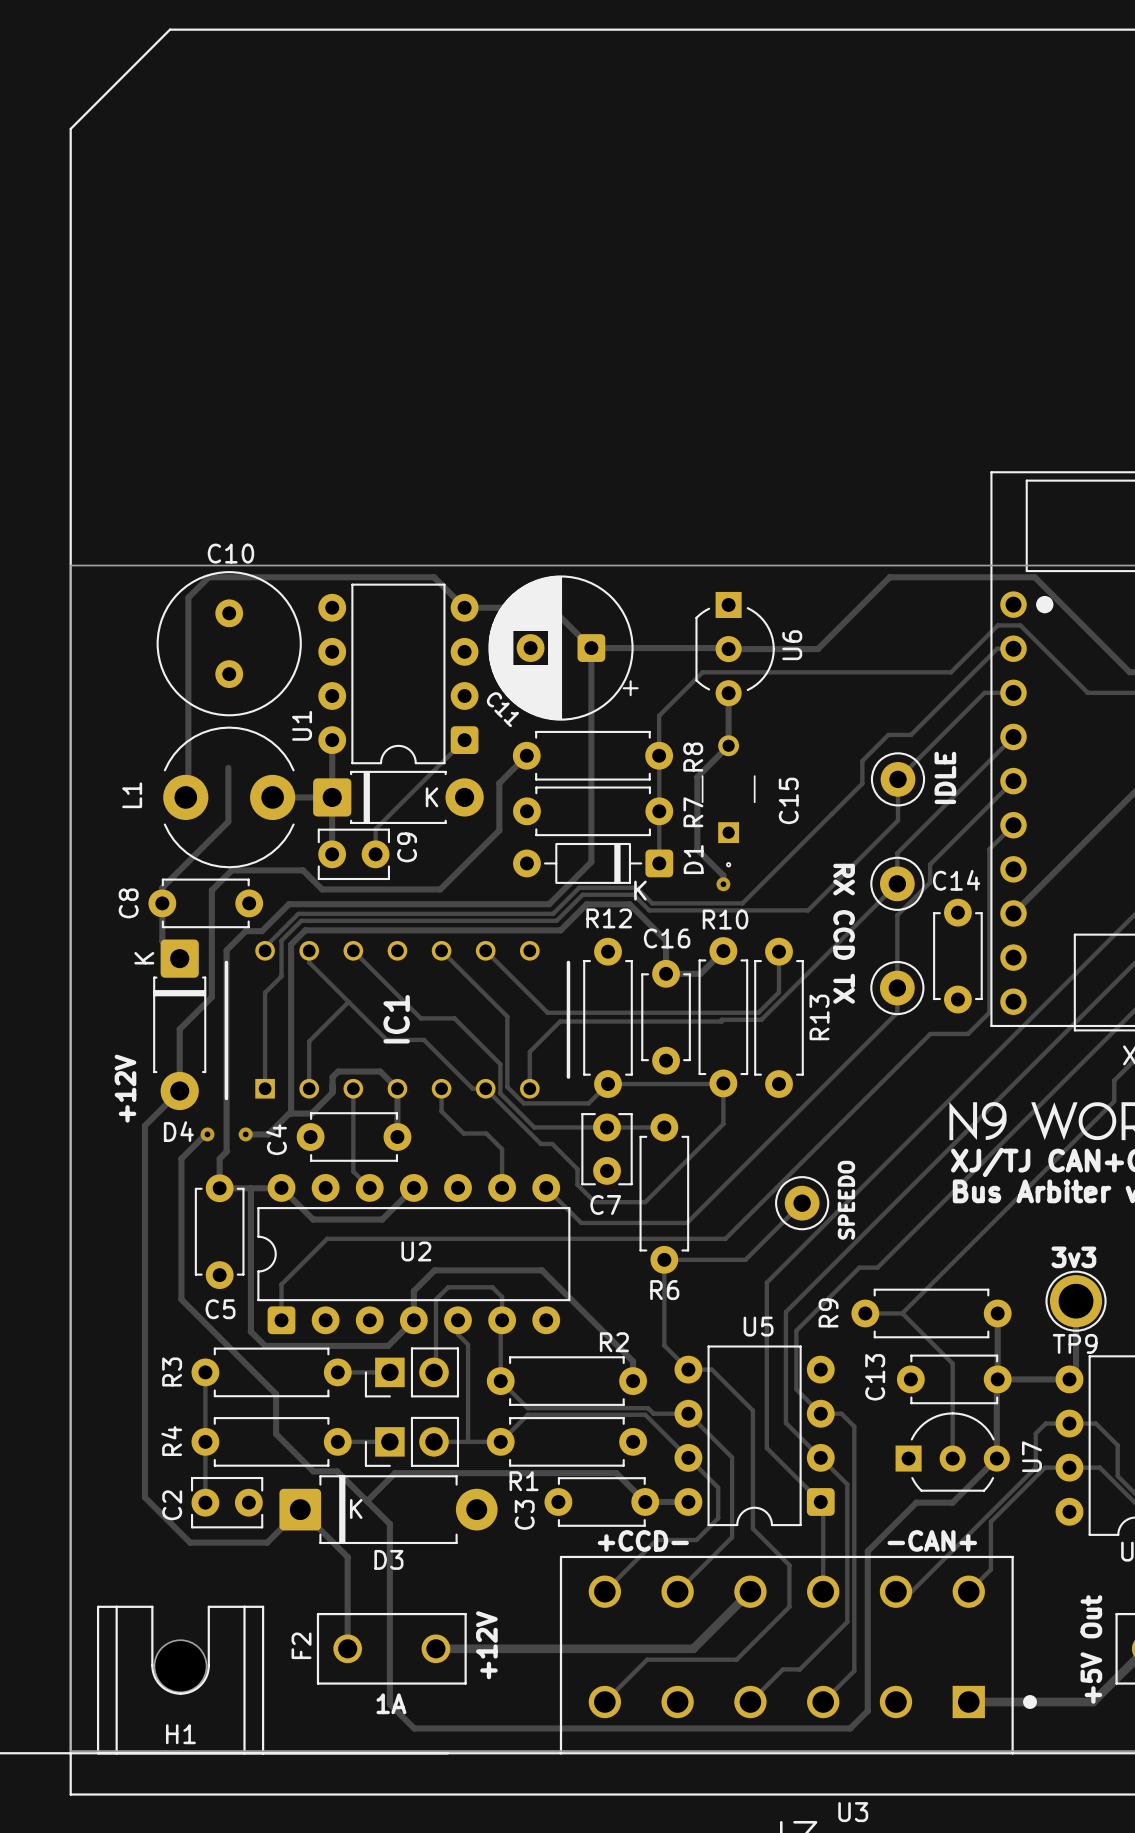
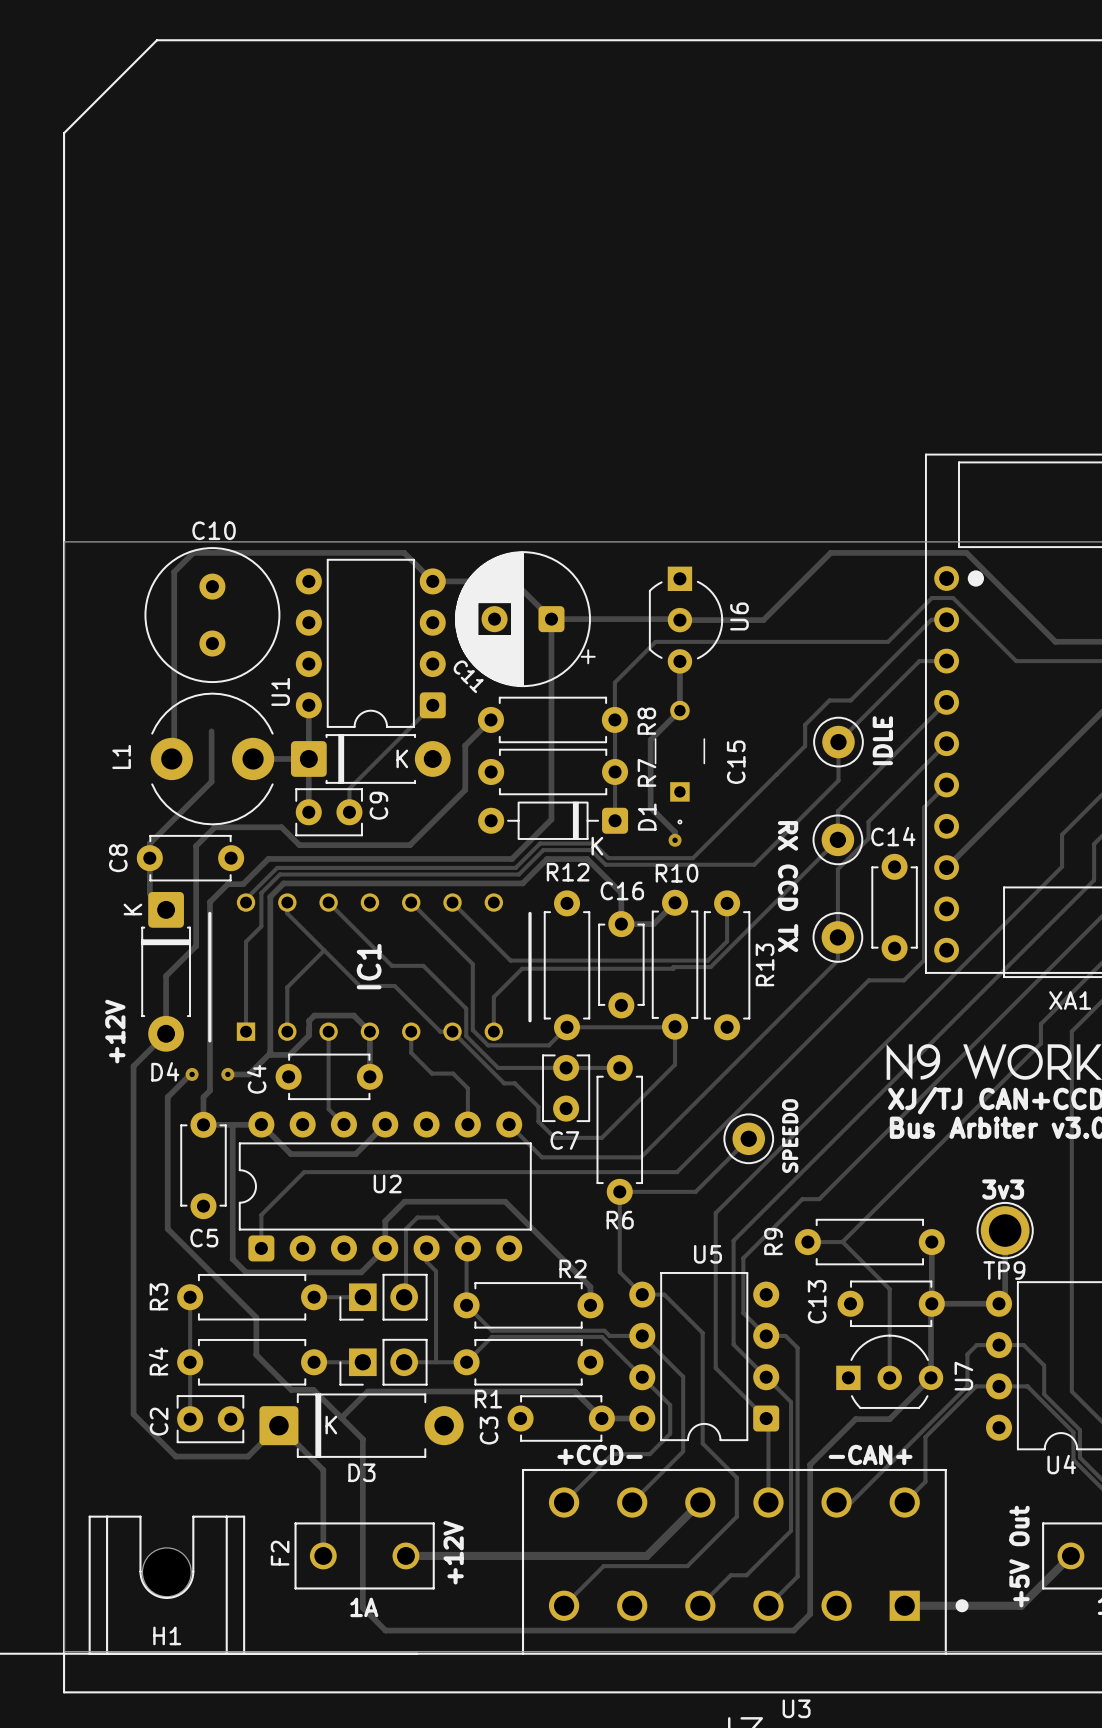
track: (469, 1287) (492, 1287) (502, 1297) (502, 1320) -> (437, 1217) (467, 1248)

